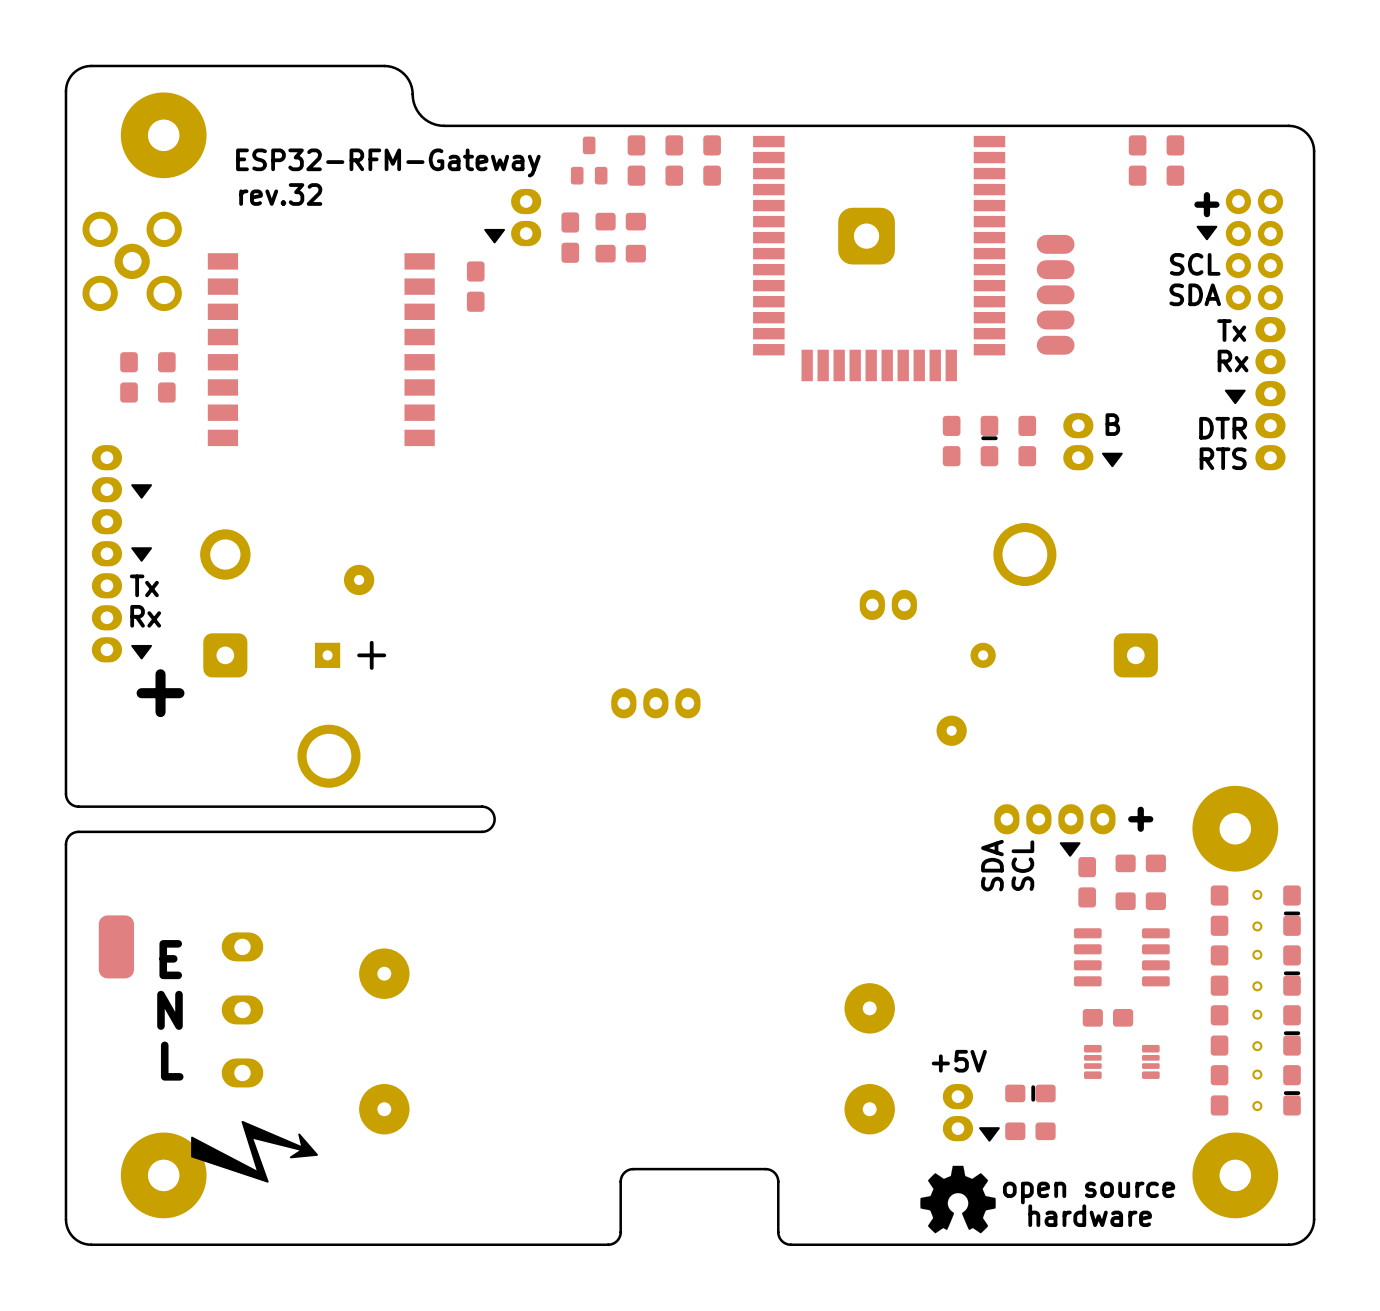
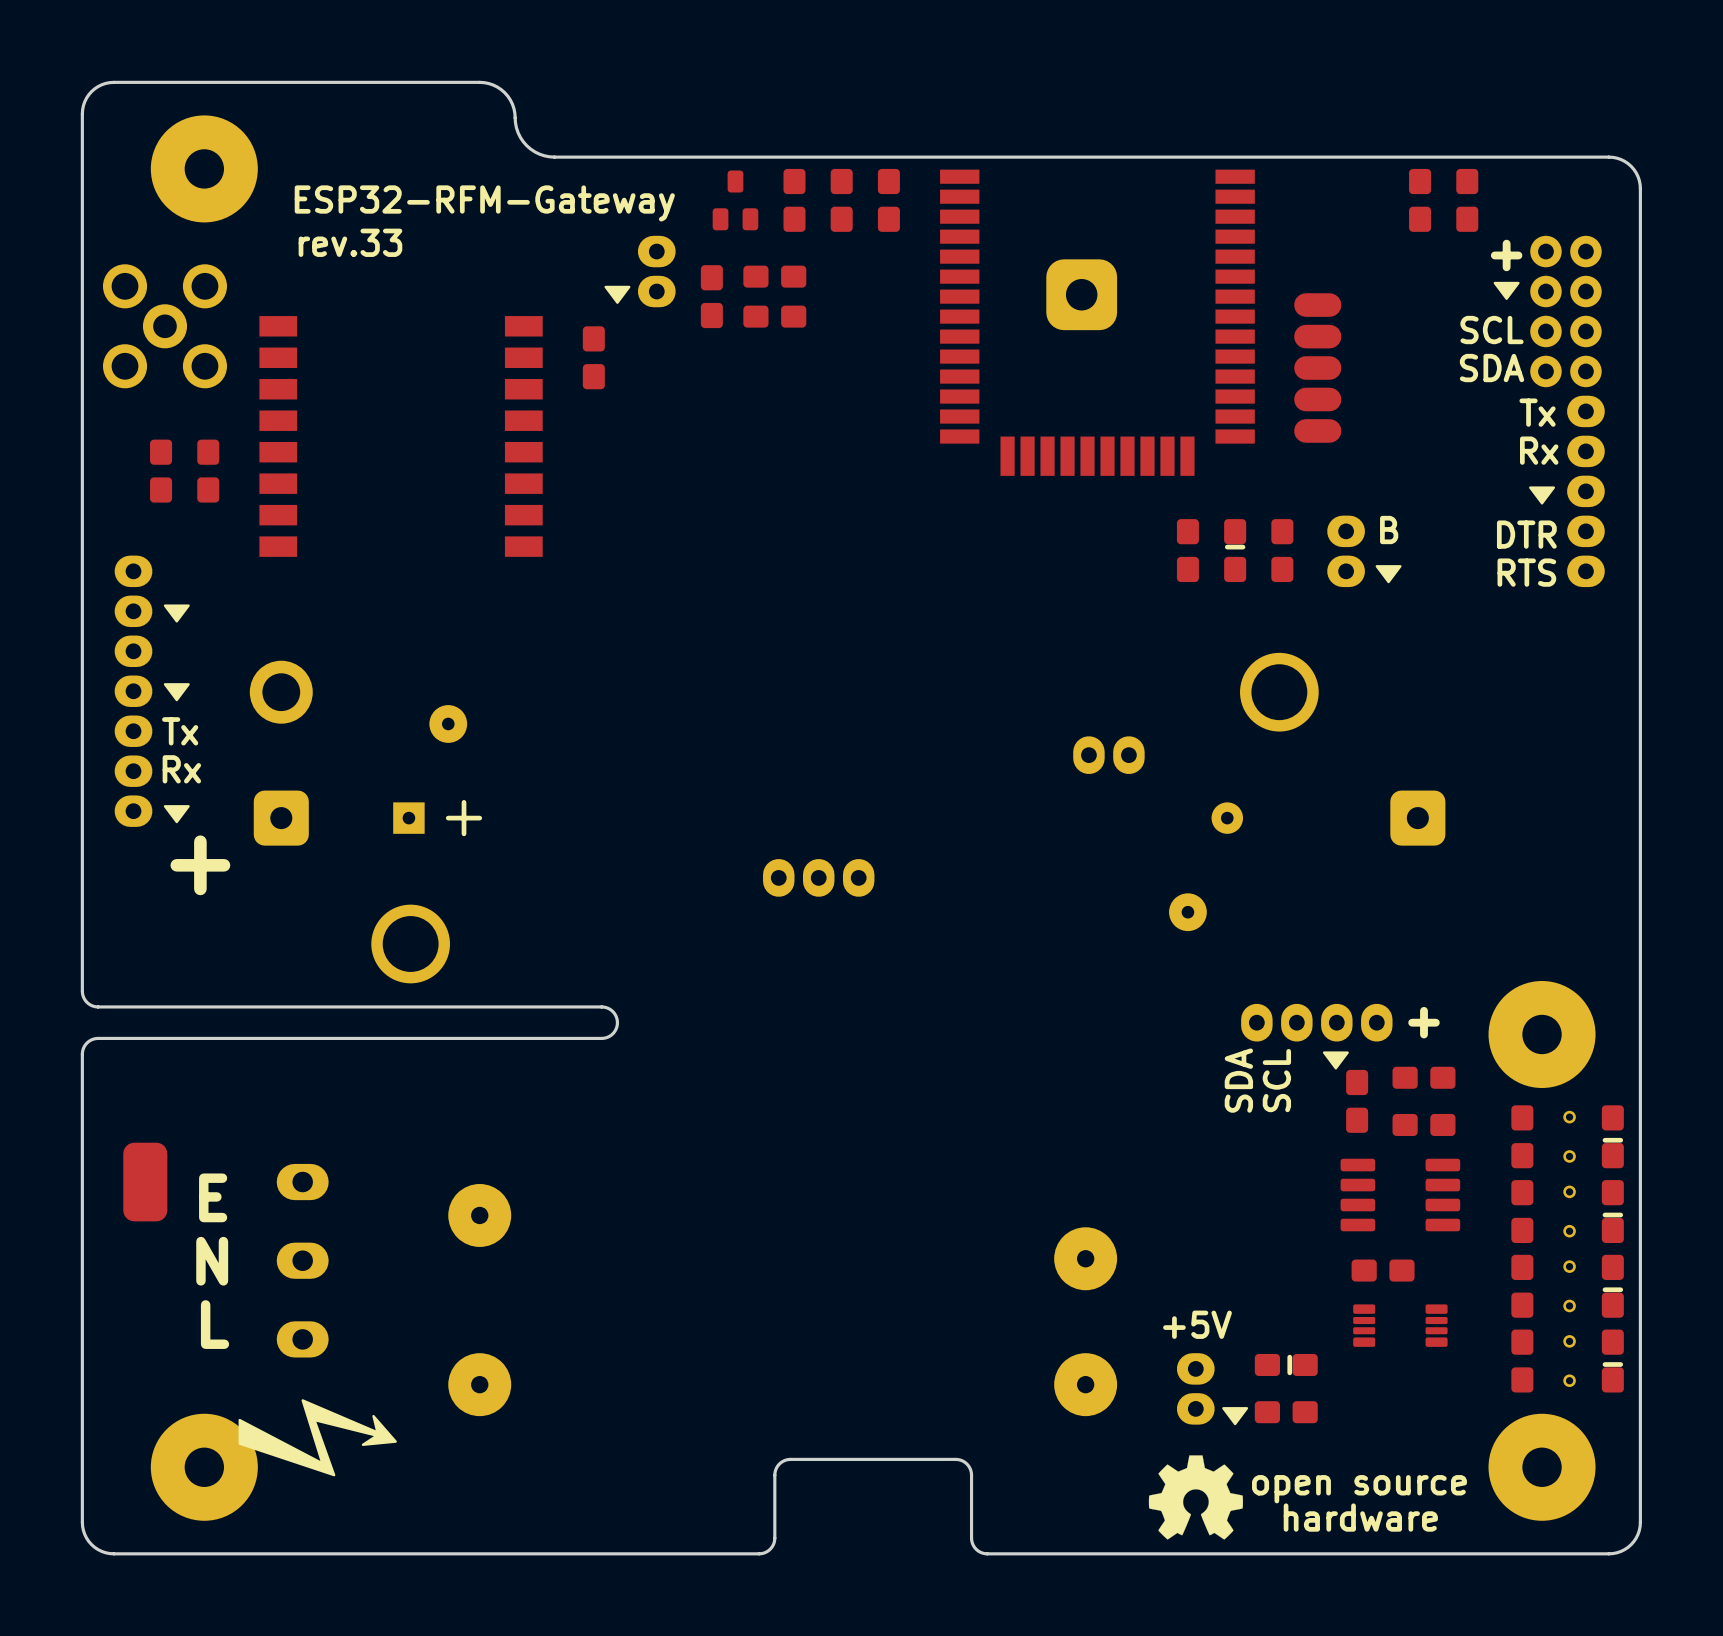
text: rev.32 (280, 194) -> rev.33 (350, 242)

